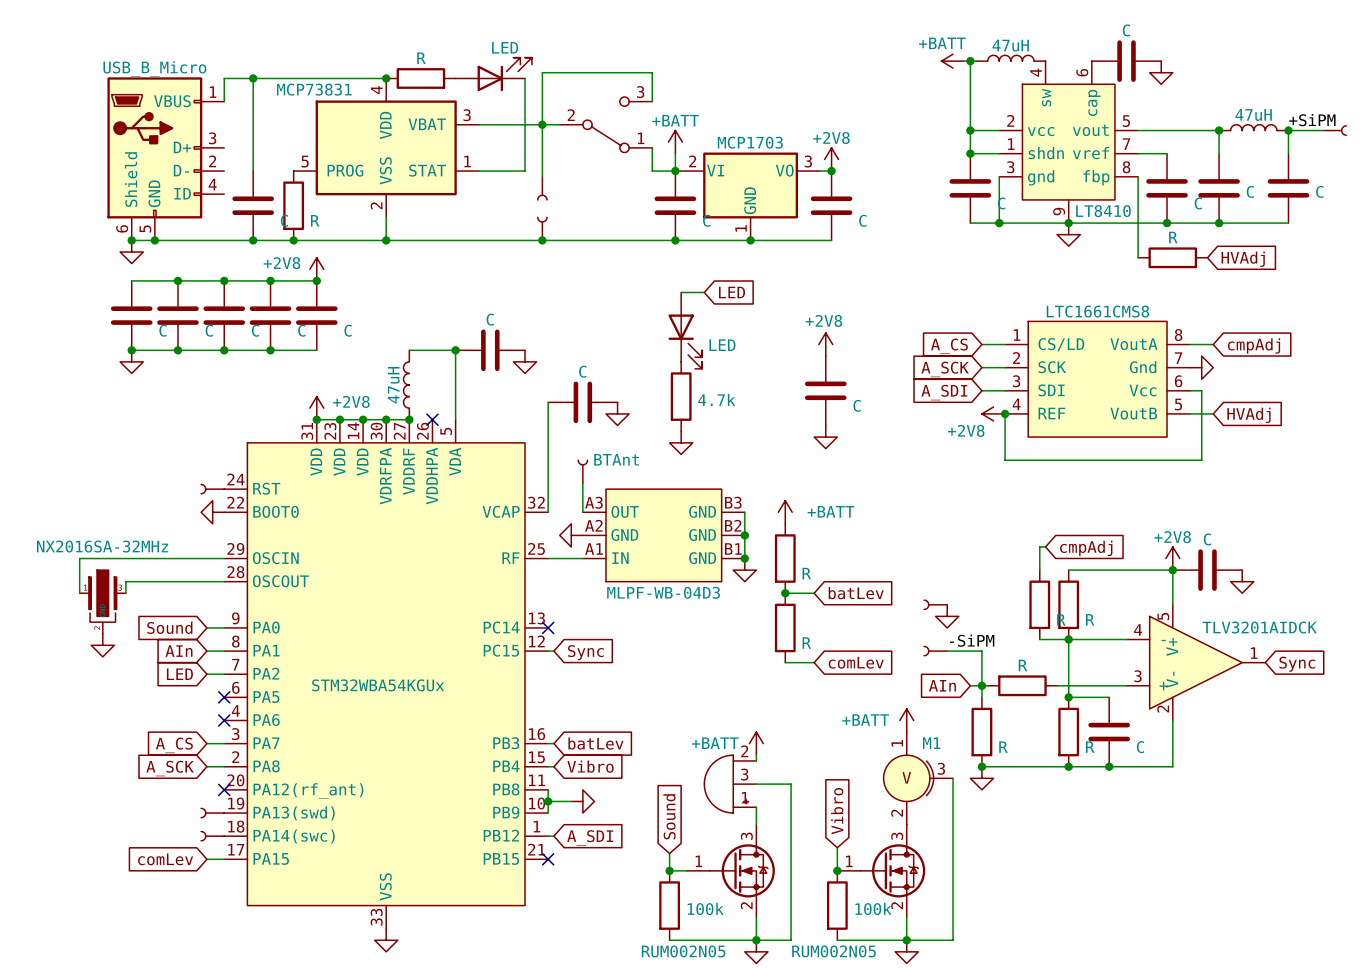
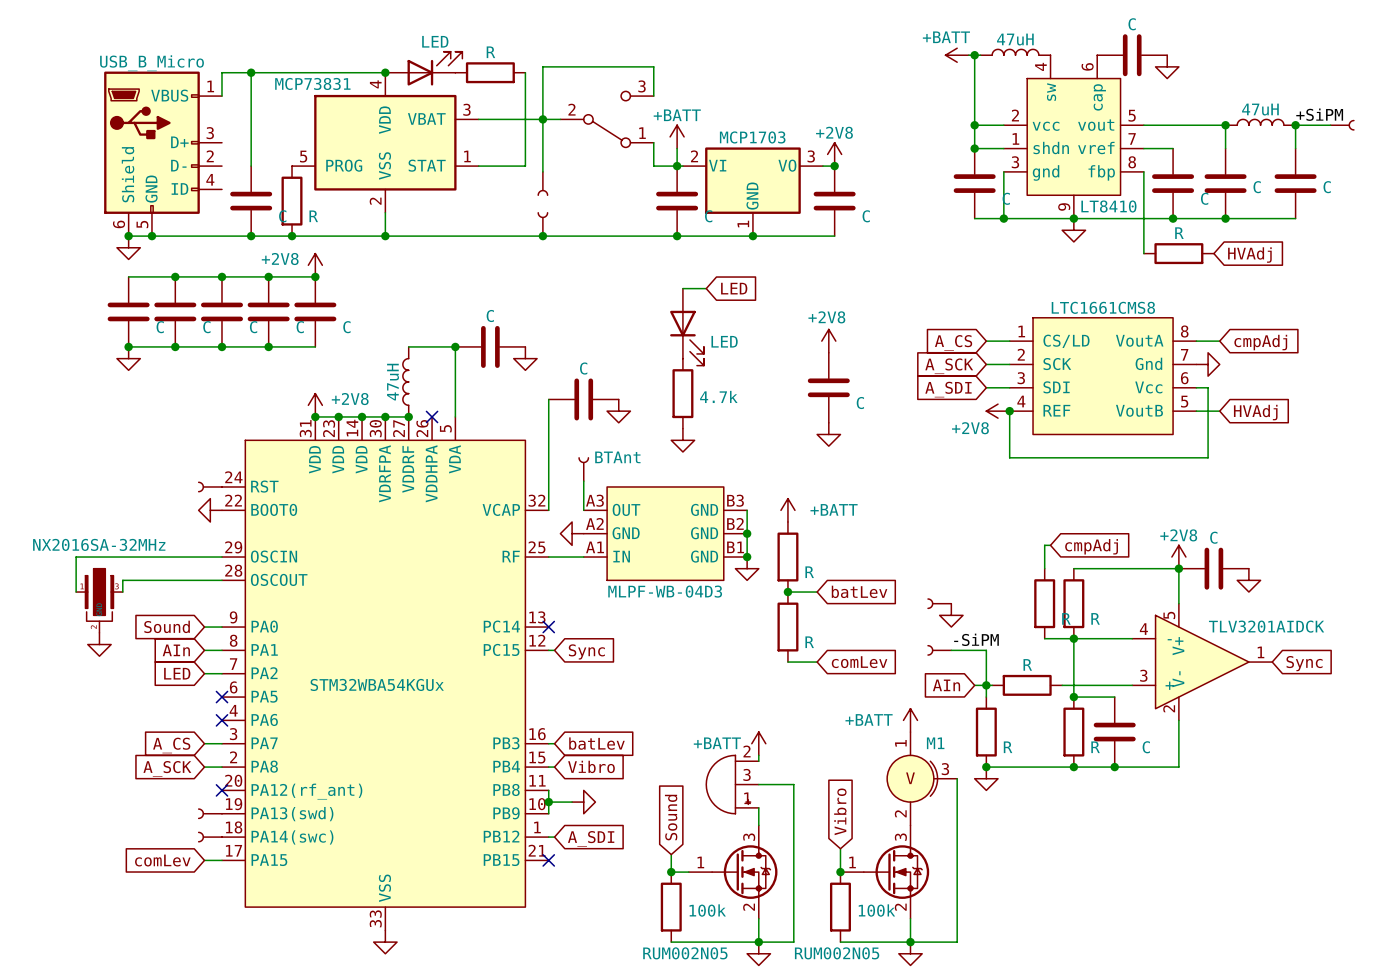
part value: LED (505, 47) -> R (490, 52)
part symbol: [455, 57, 532, 92] -> [455, 62, 526, 84]
part value: R (421, 58) -> LED (435, 41)
part symbol: [386, 68, 456, 89] -> [385, 51, 463, 86]

